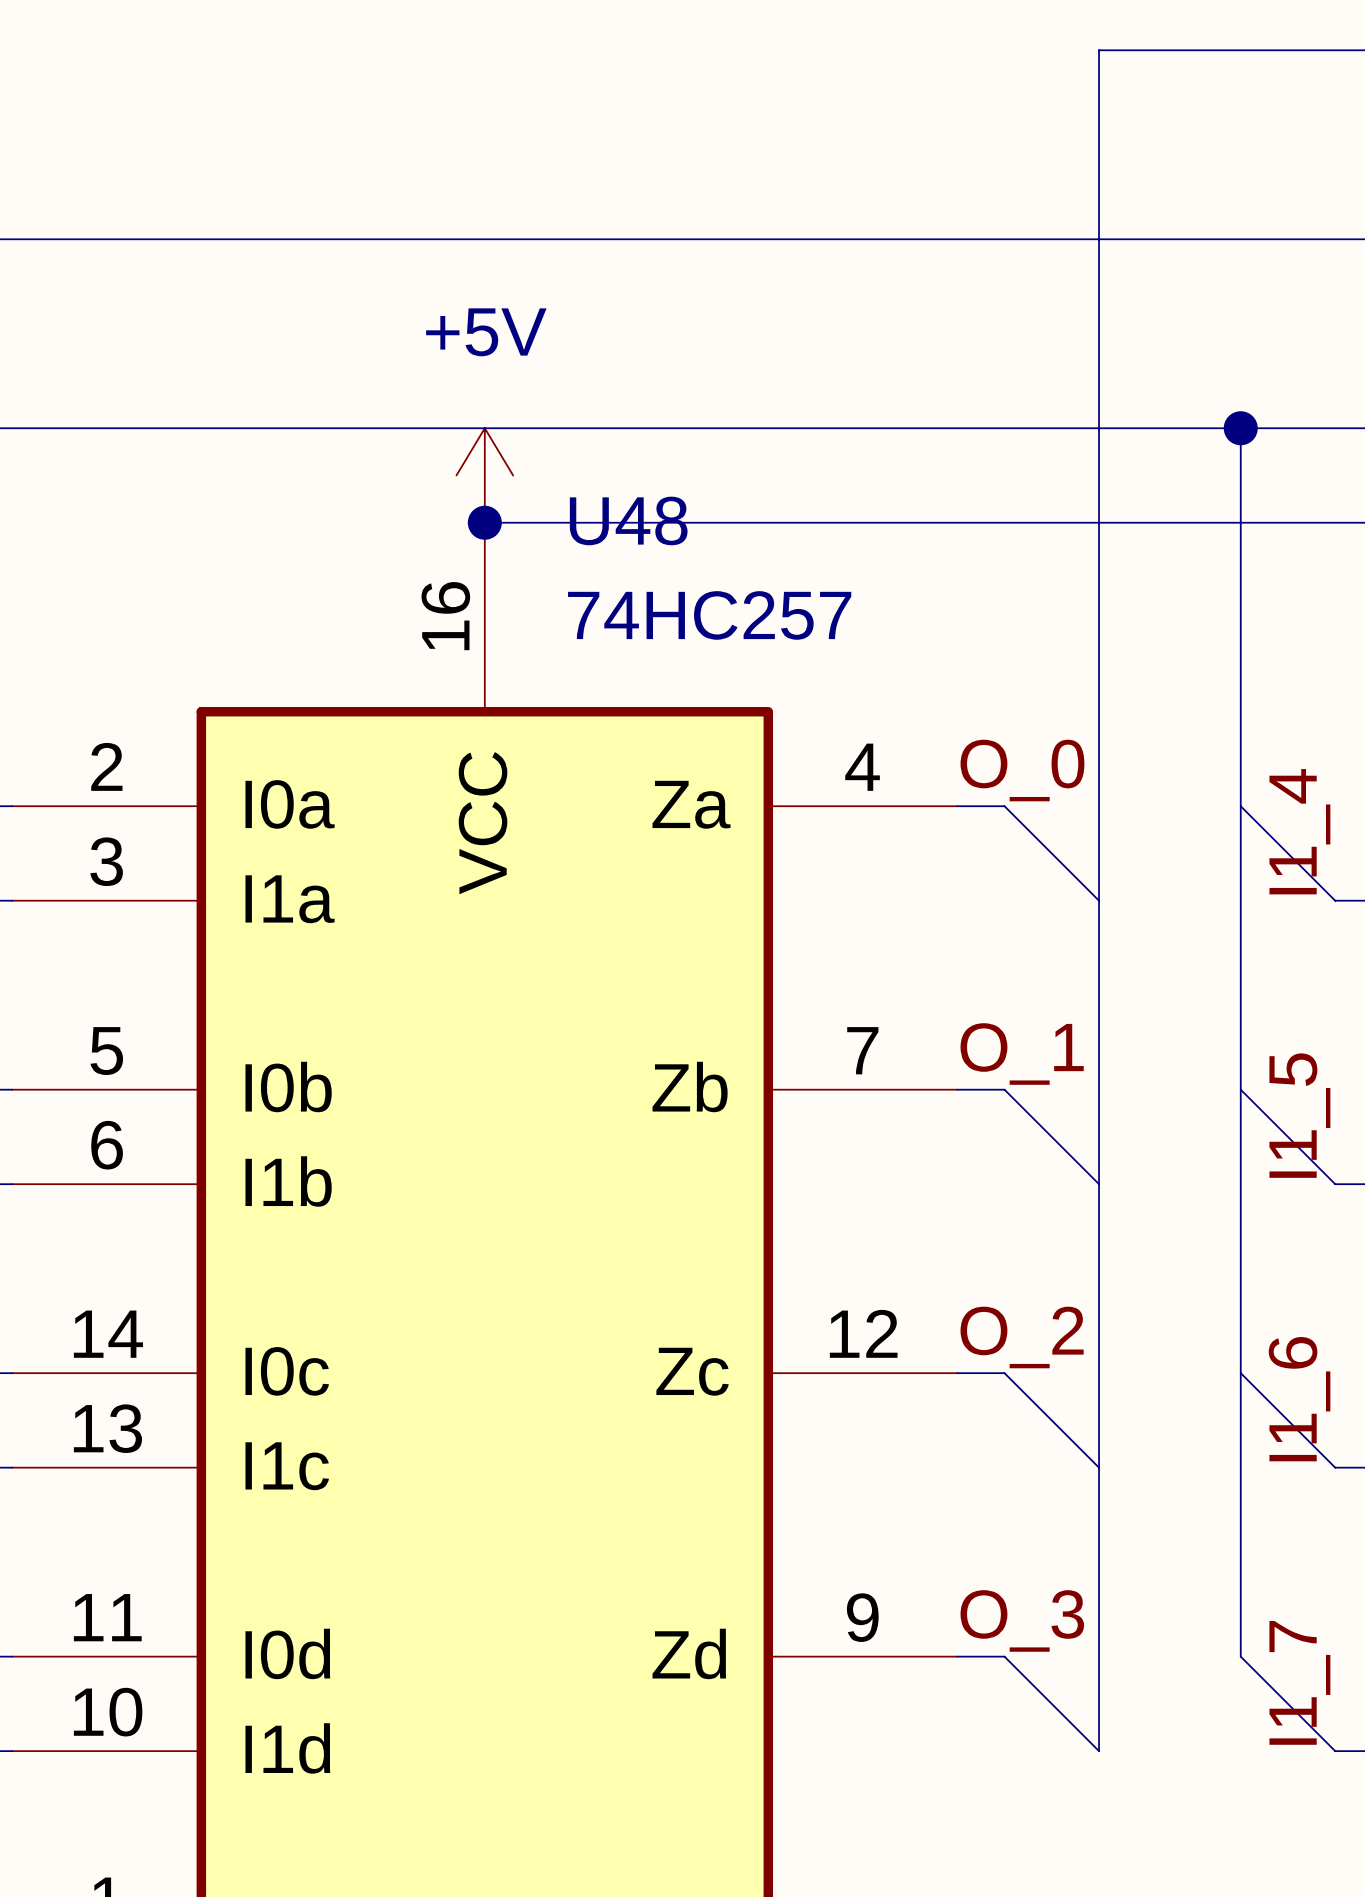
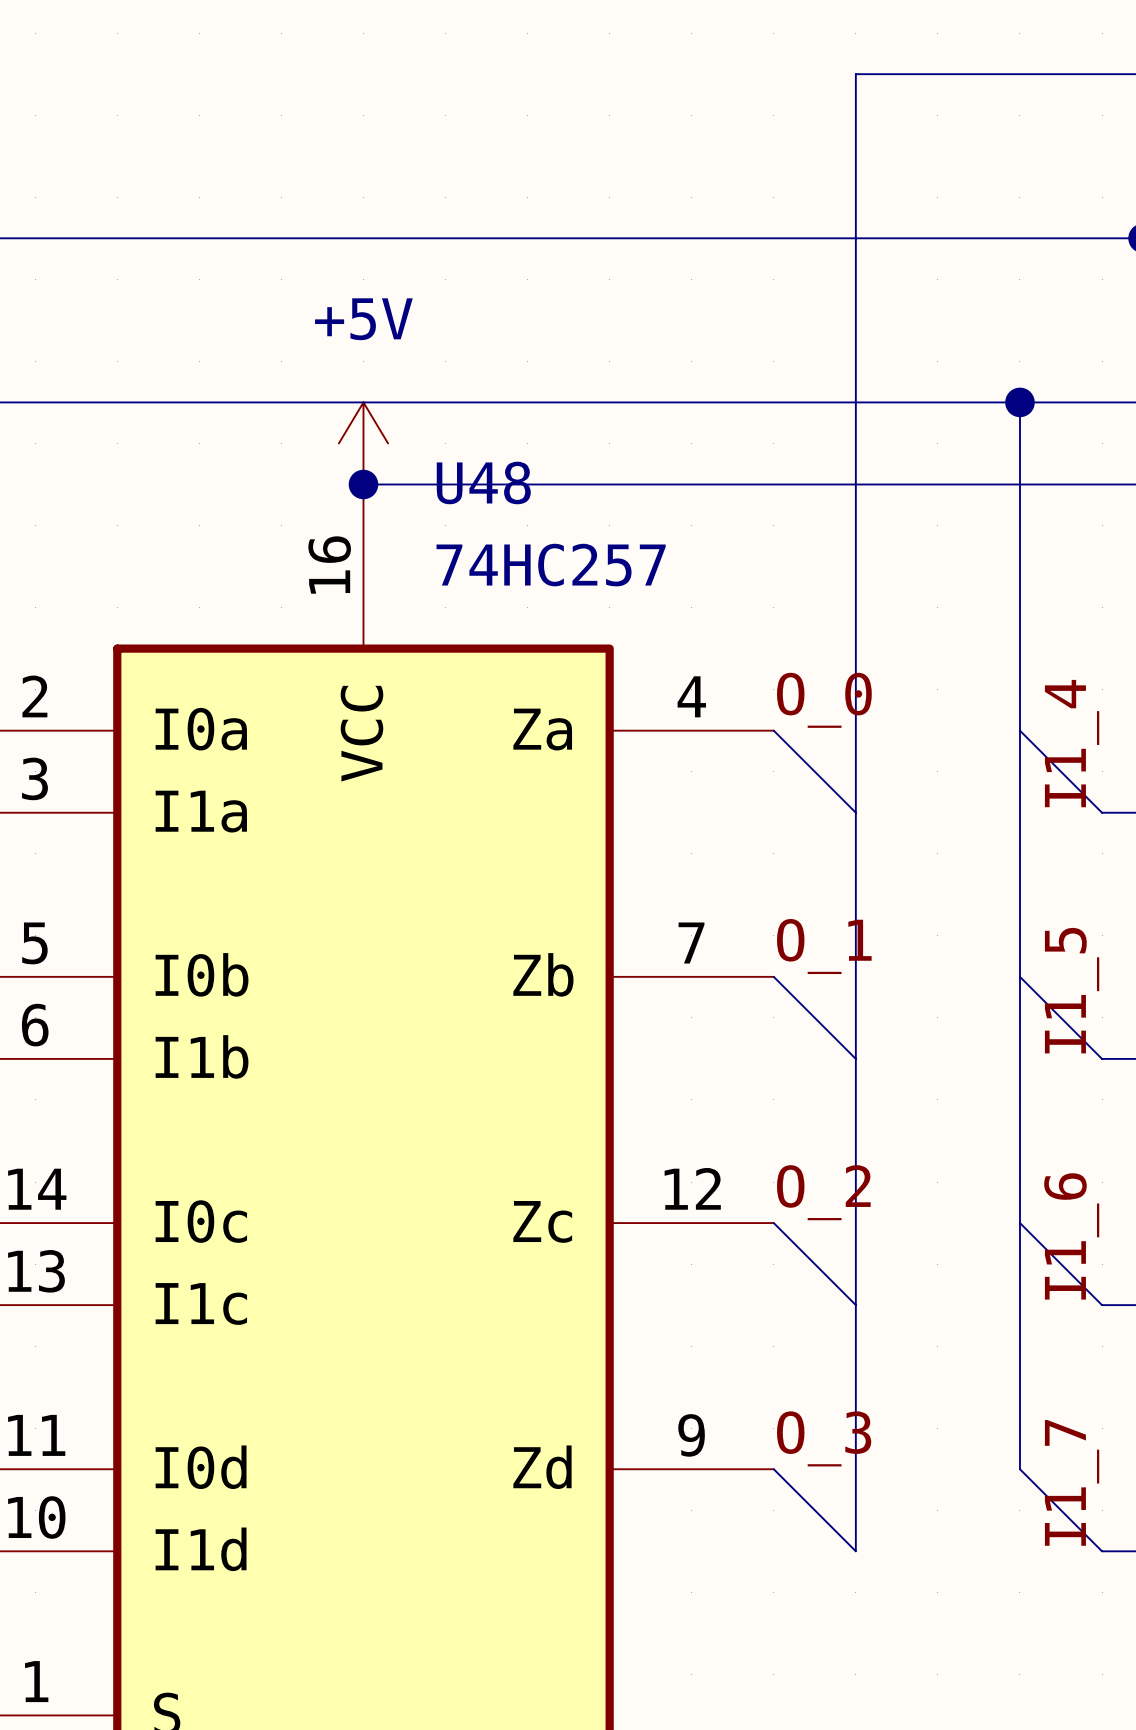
bus: (1099, 50) (1099, 1751) -> (896, 74) (855, 74) (855, 1551)
wire: (957, 806) (1004, 806) (1099, 900) -> (773, 730) (855, 812)
wire: (957, 1089) (1004, 1089) (1099, 1184) -> (773, 976) (855, 1058)
wire: (957, 1373) (1004, 1373) (1099, 1467) -> (773, 1223) (855, 1305)
wire: (957, 1656) (1004, 1656) (1099, 1751) -> (773, 1469) (855, 1551)

